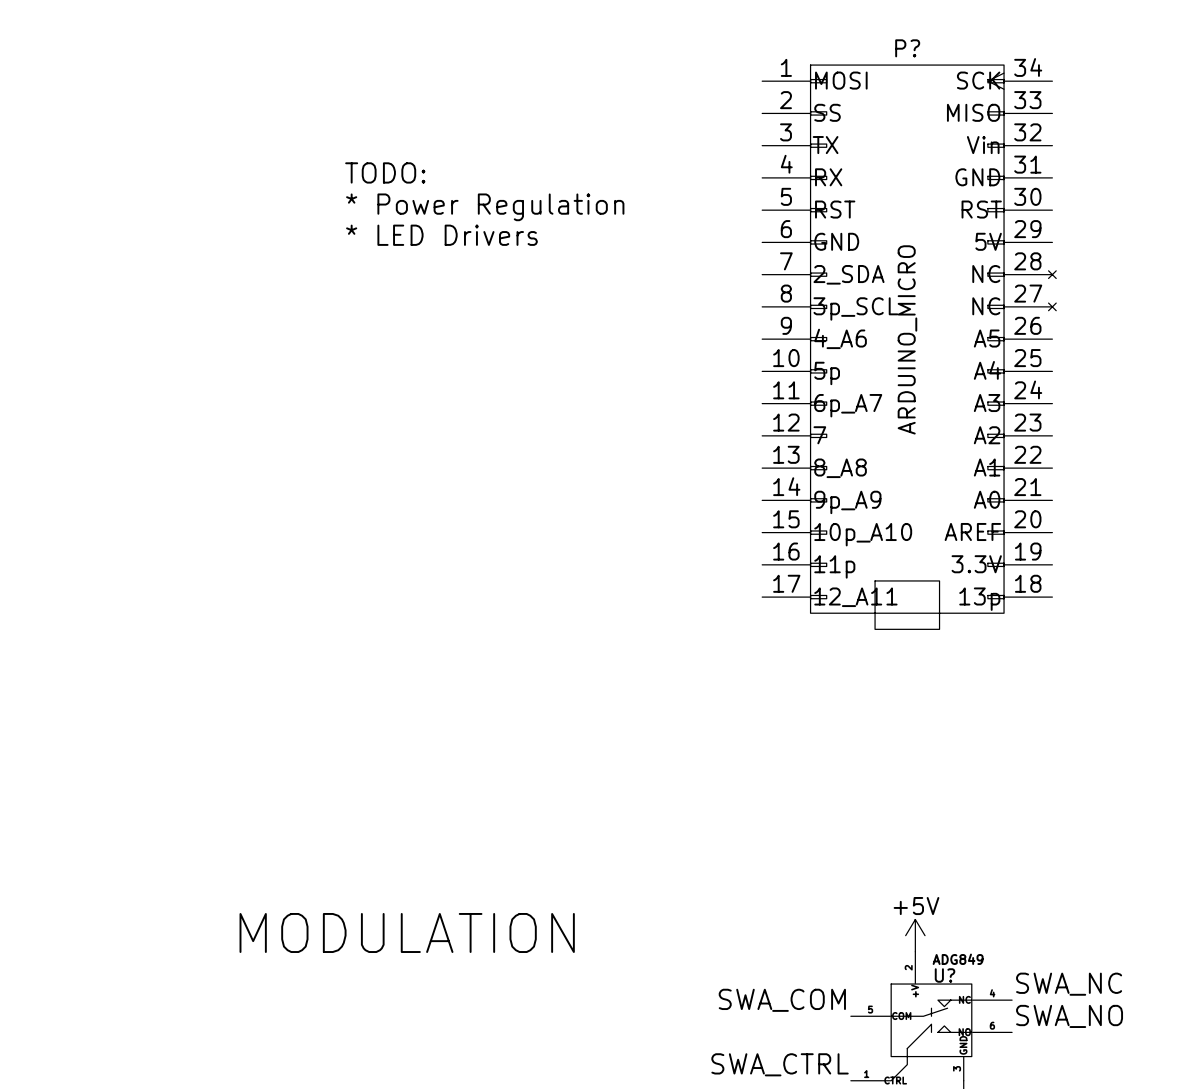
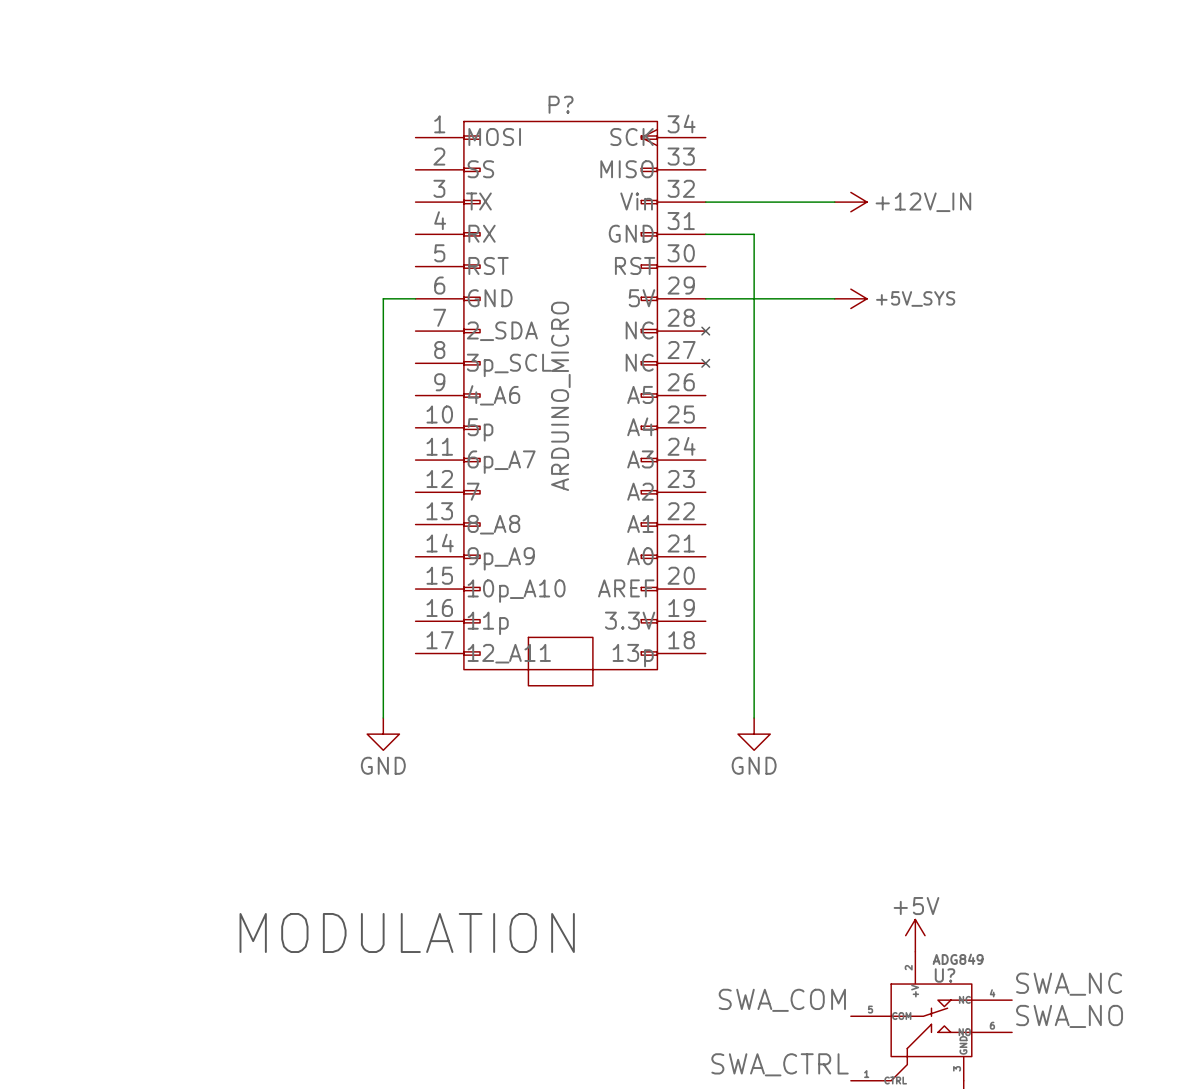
text: TODO: (385, 172) -> none
wire: none -> (705, 202) (834, 202)
power symbol: none -> +12V_IN (850, 202)
text: * Power Regulation (485, 207) -> none
wire: none -> (705, 234) (754, 234) (754, 718)
text: * LED Drivers (441, 235) -> none
wire: none -> (415, 298) (383, 298) (383, 718)
wire: none -> (705, 298) (834, 298)
power symbol: none -> +5V_SYS (850, 298)
P?: ARDUINO_MICRO (909, 347) -> none
P?: none -> ARDUINO_MICRO (562, 403)
power symbol: none -> GND (383, 734)
power symbol: none -> GND (754, 734)

